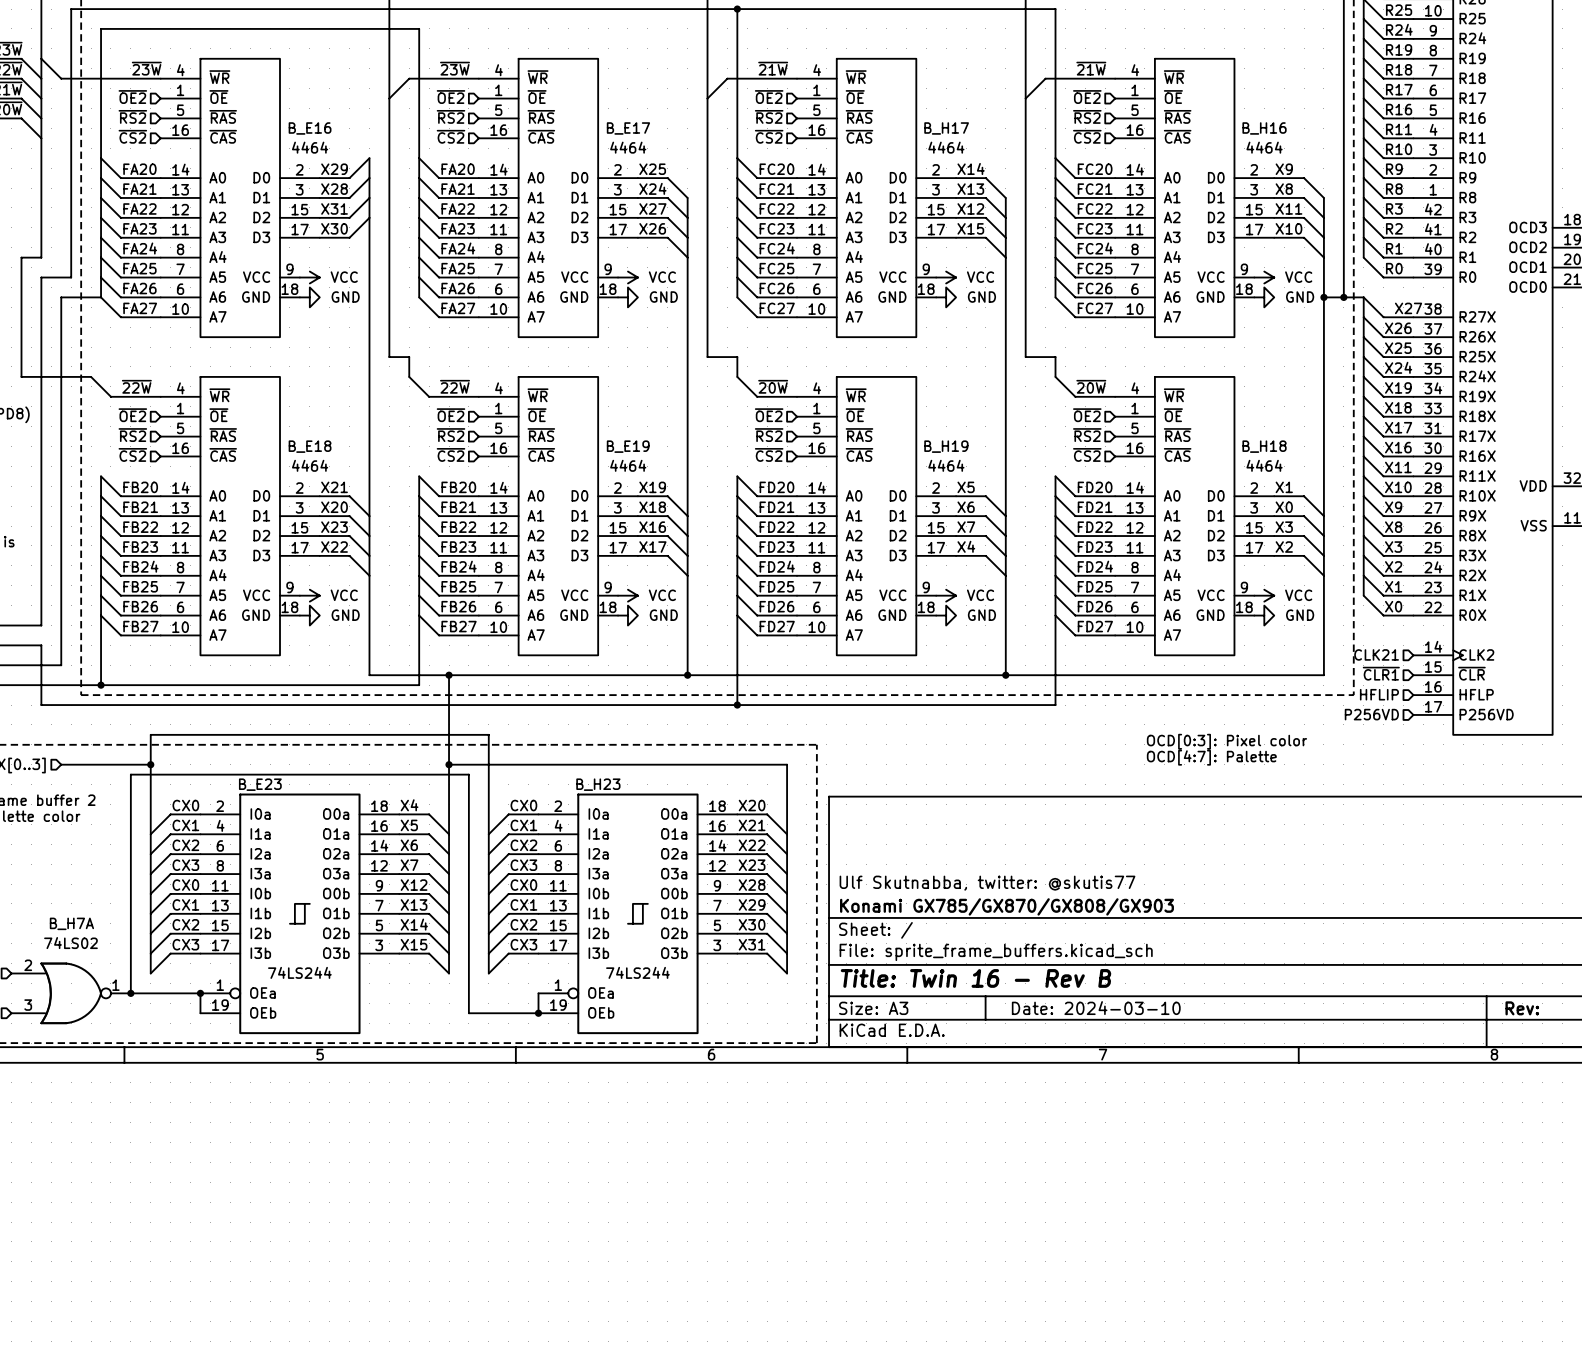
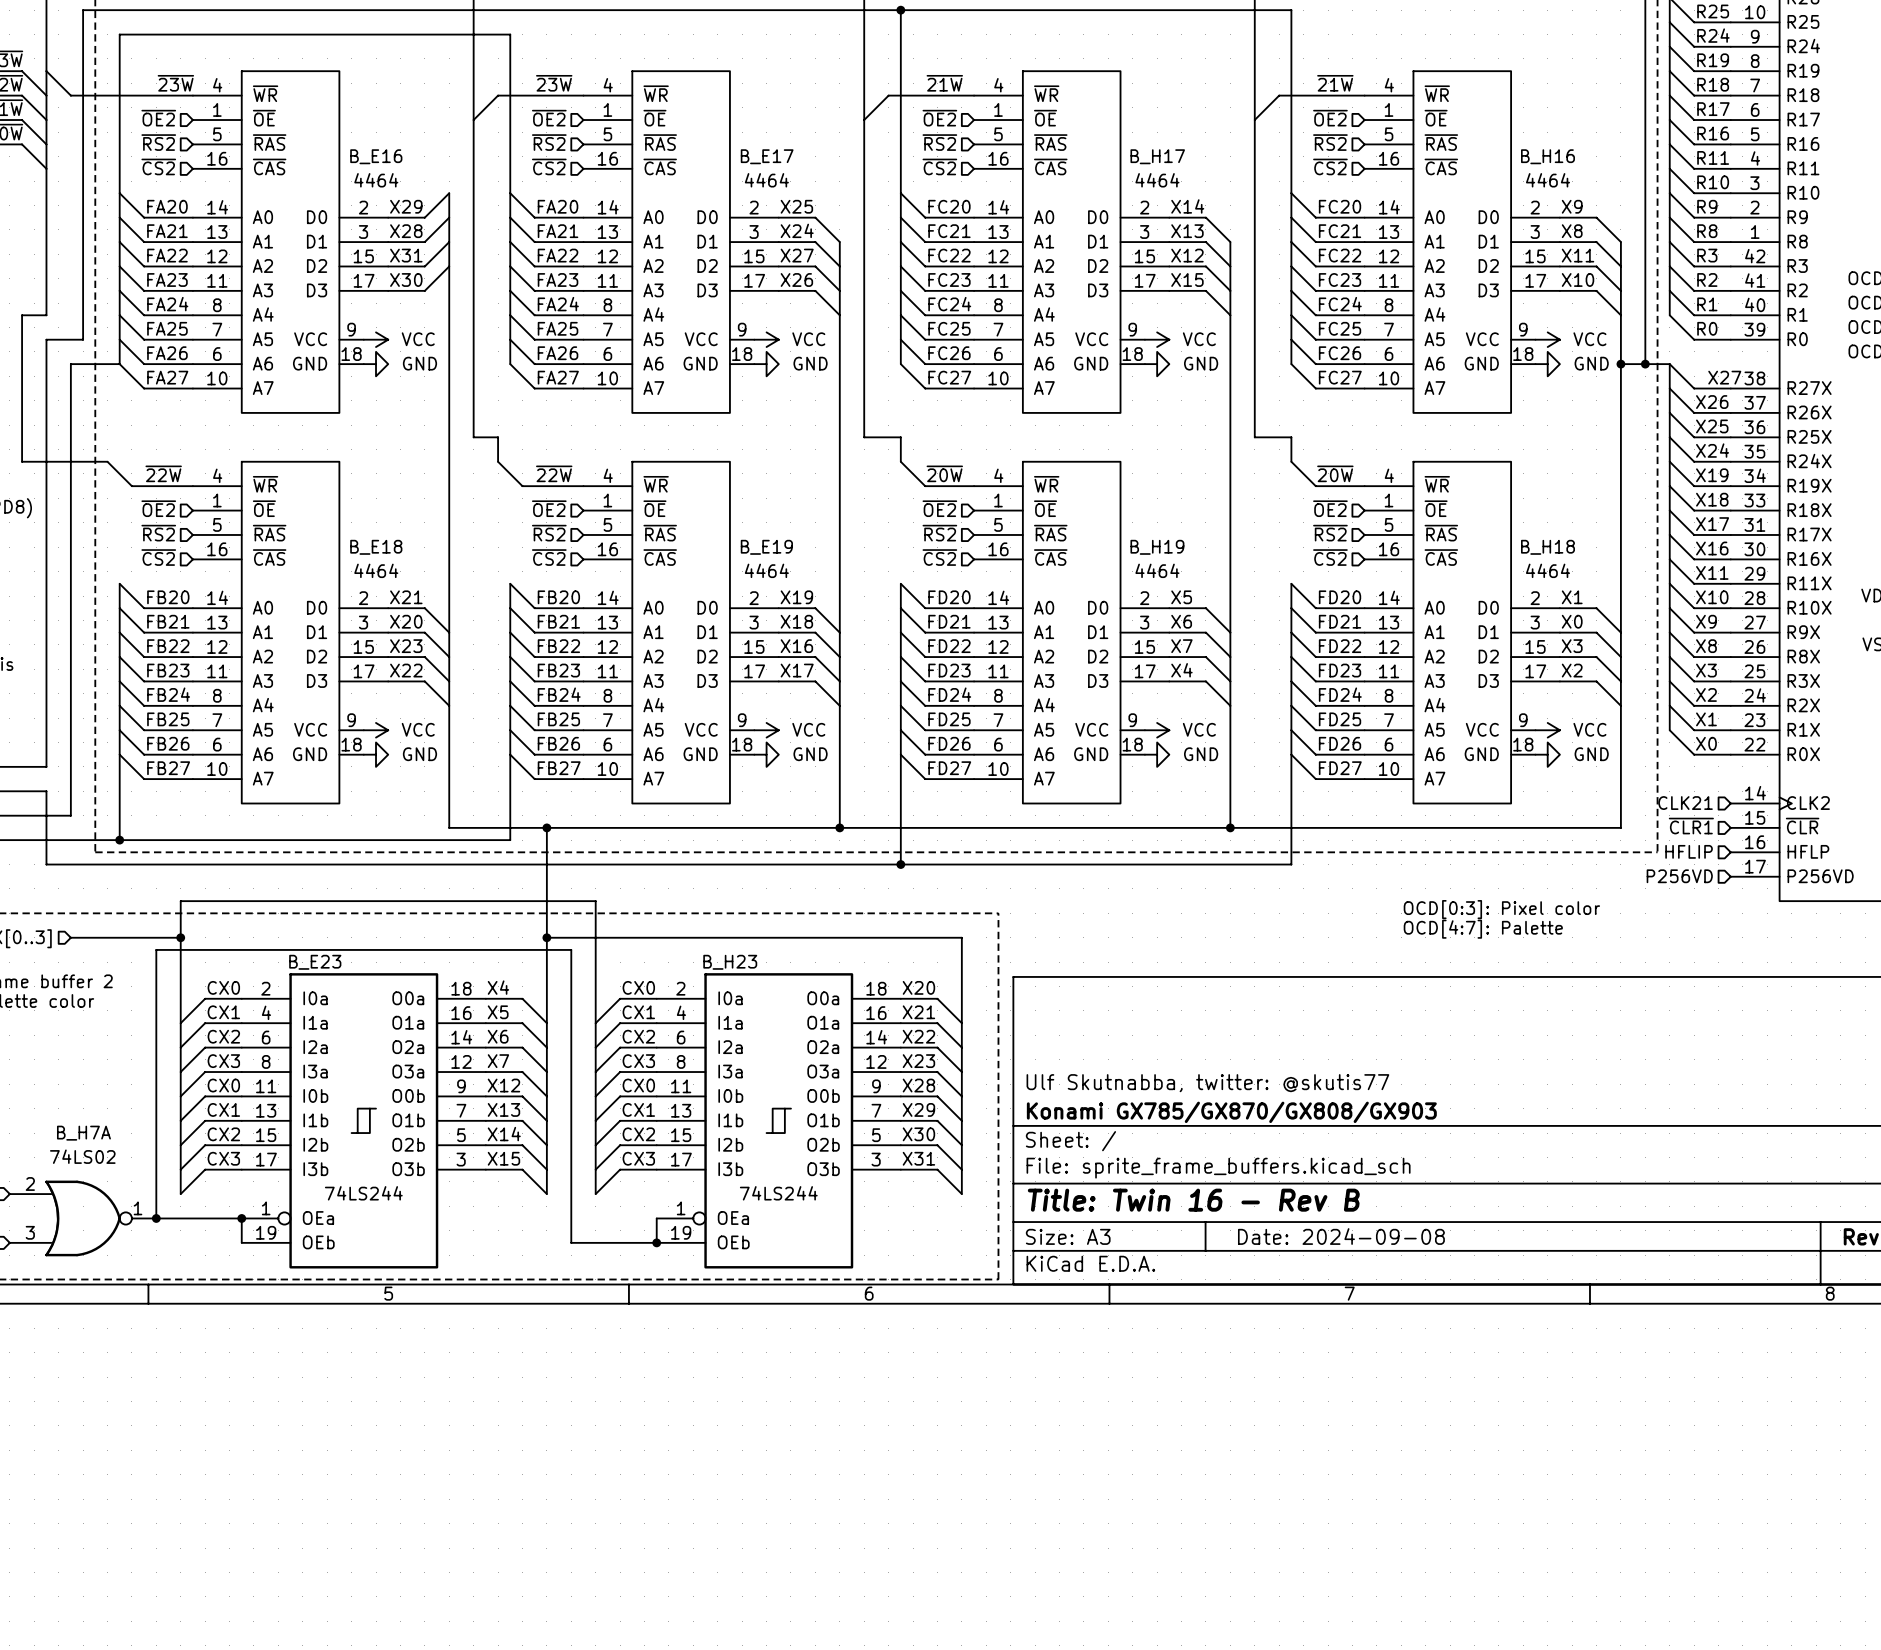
title block: Date: 2024-03-10 (1096, 1008) -> Date: 2024-09-08 (1341, 1236)

